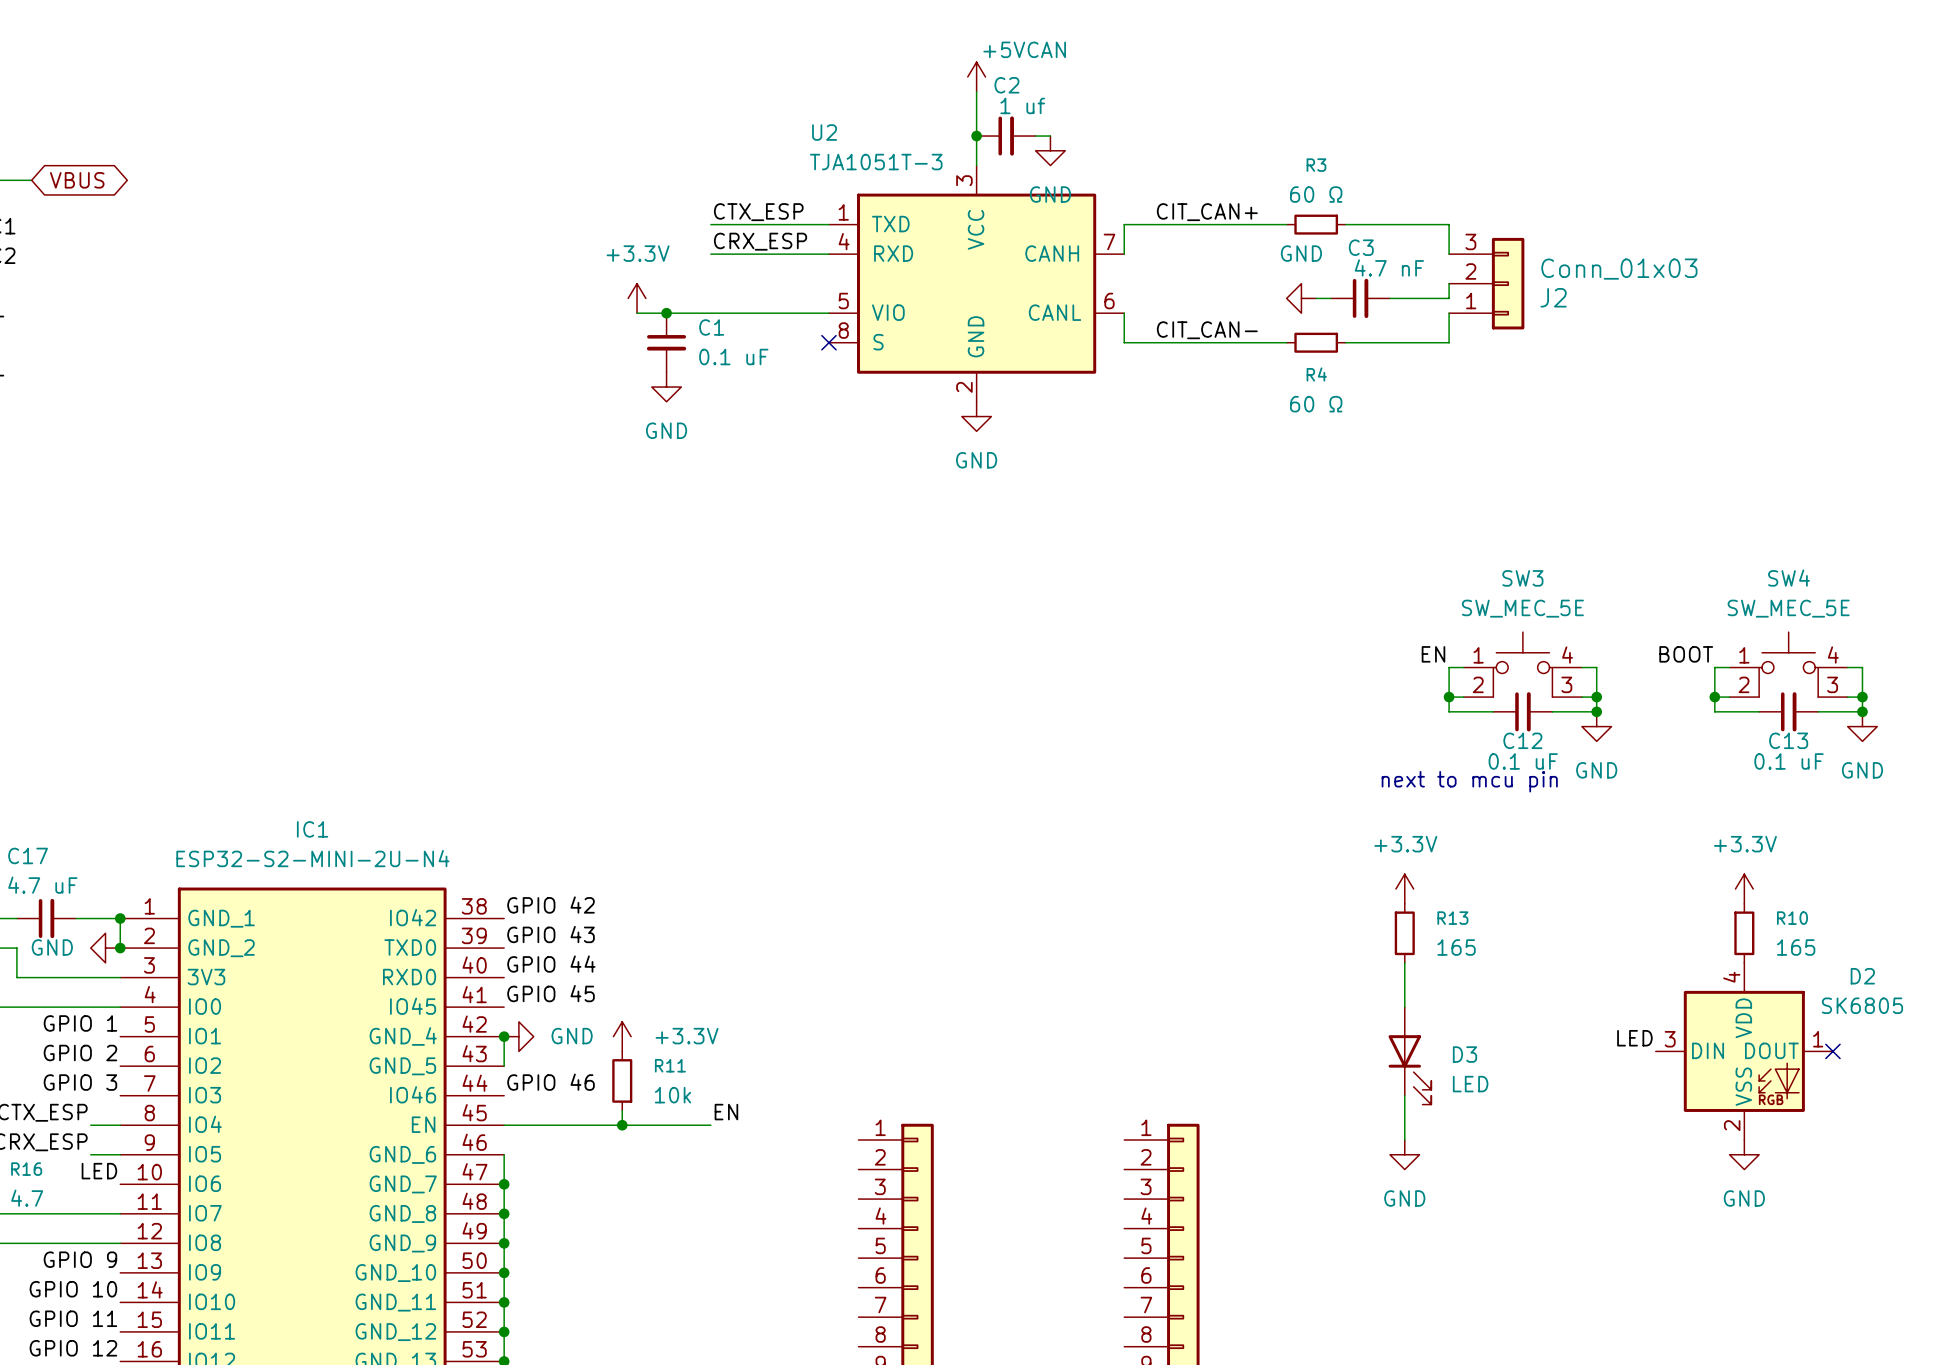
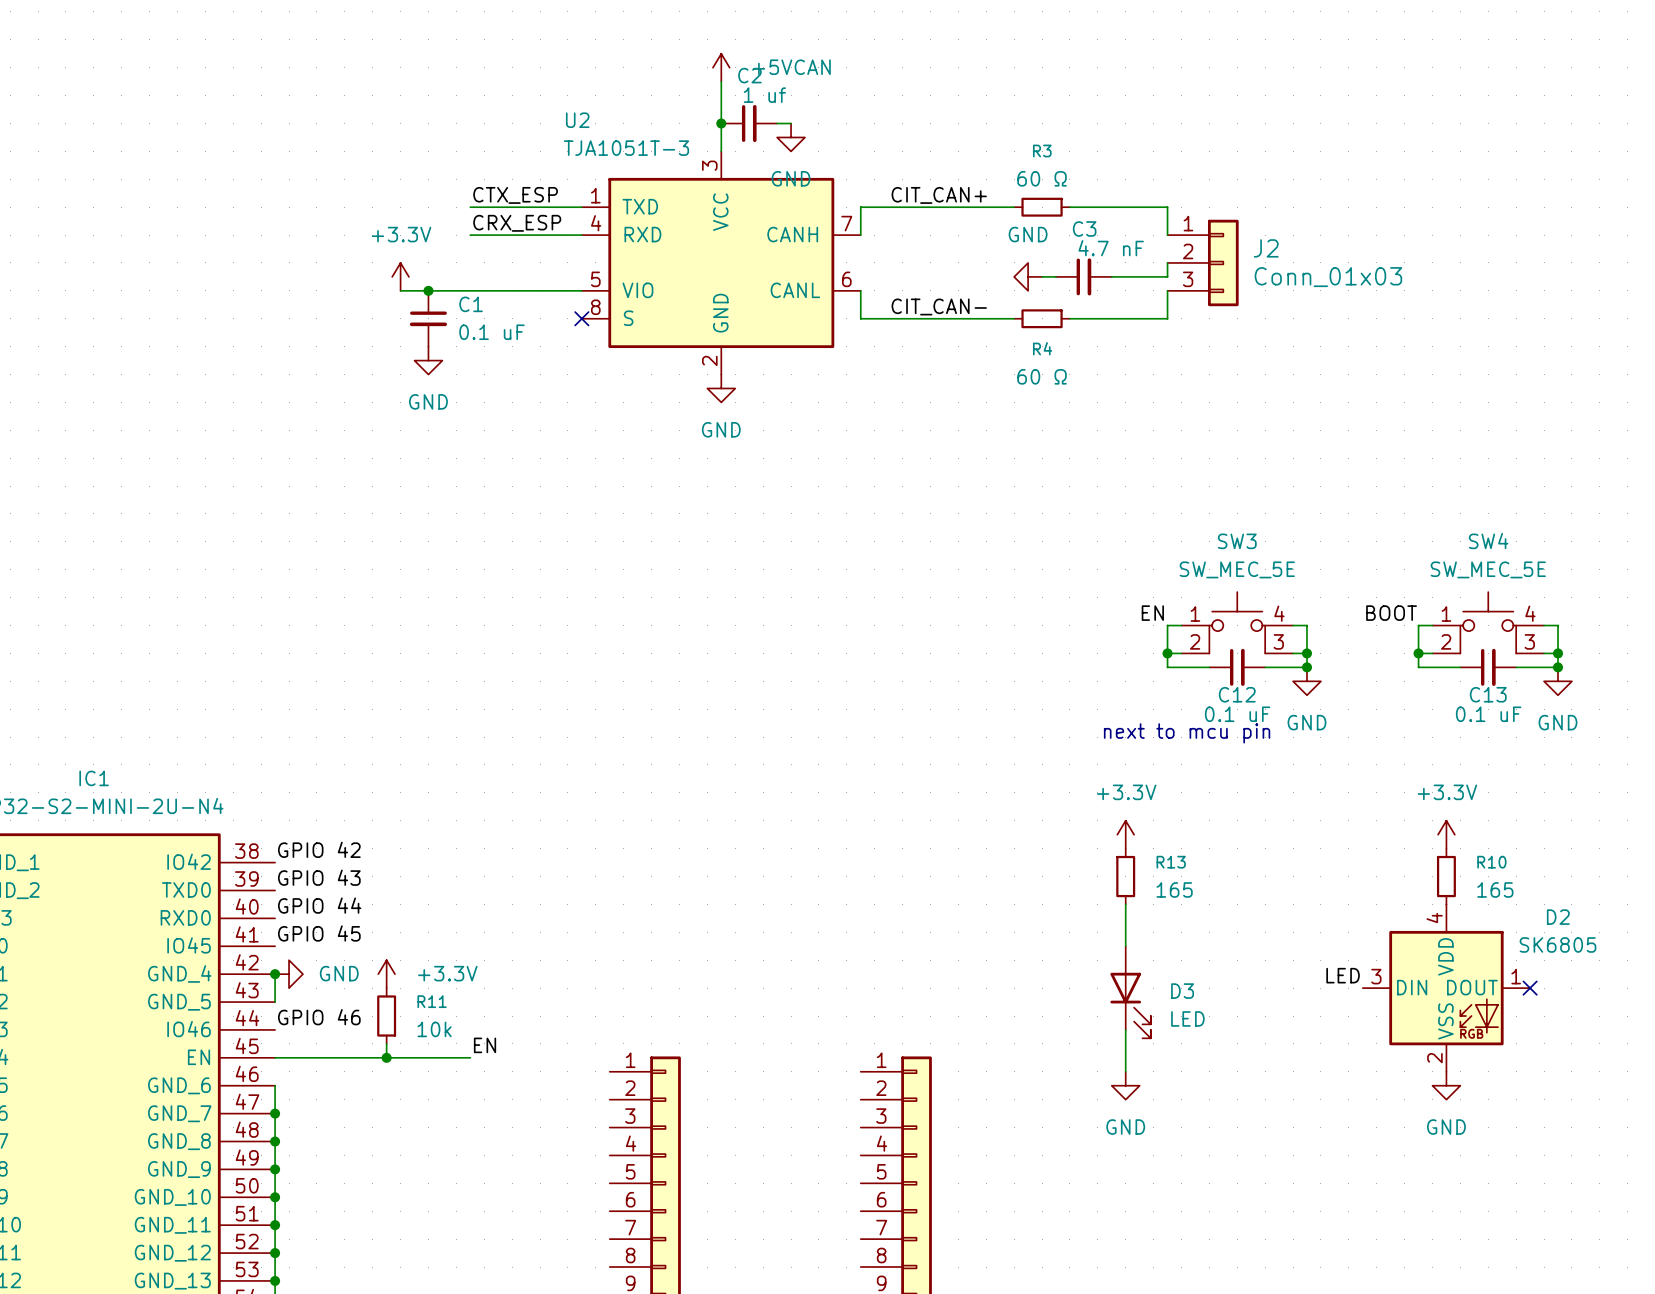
power symbol text position: +5VCAN (1024, 49) -> +5VCAN (791, 67)
J2 flip: as is (1508, 283) -> up-down (1223, 262)

